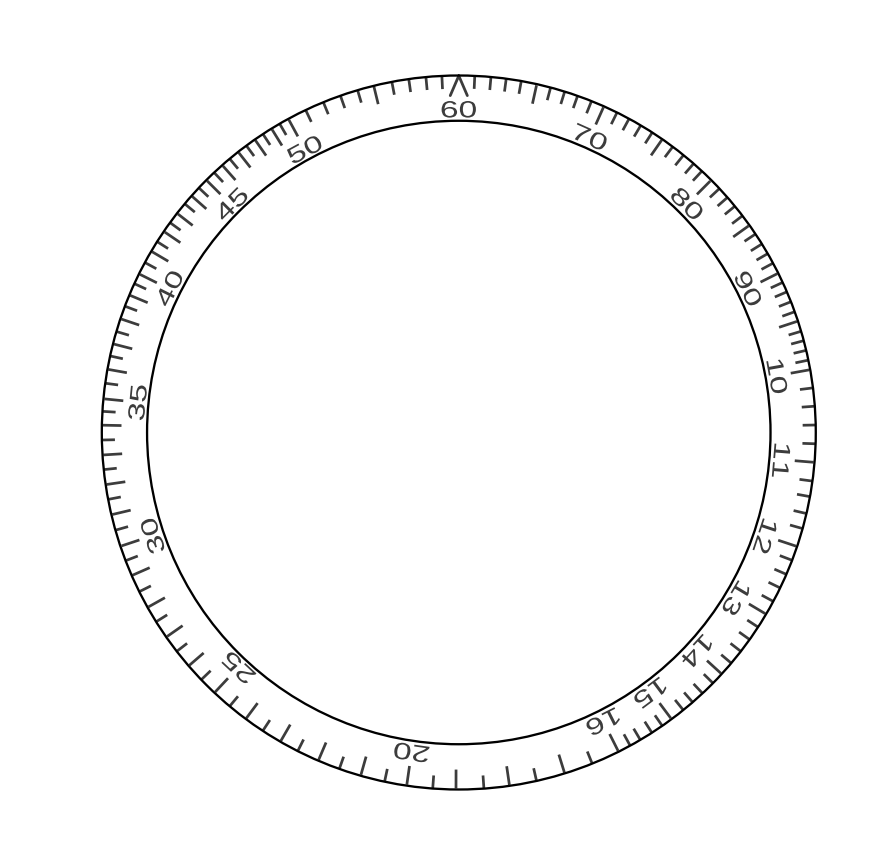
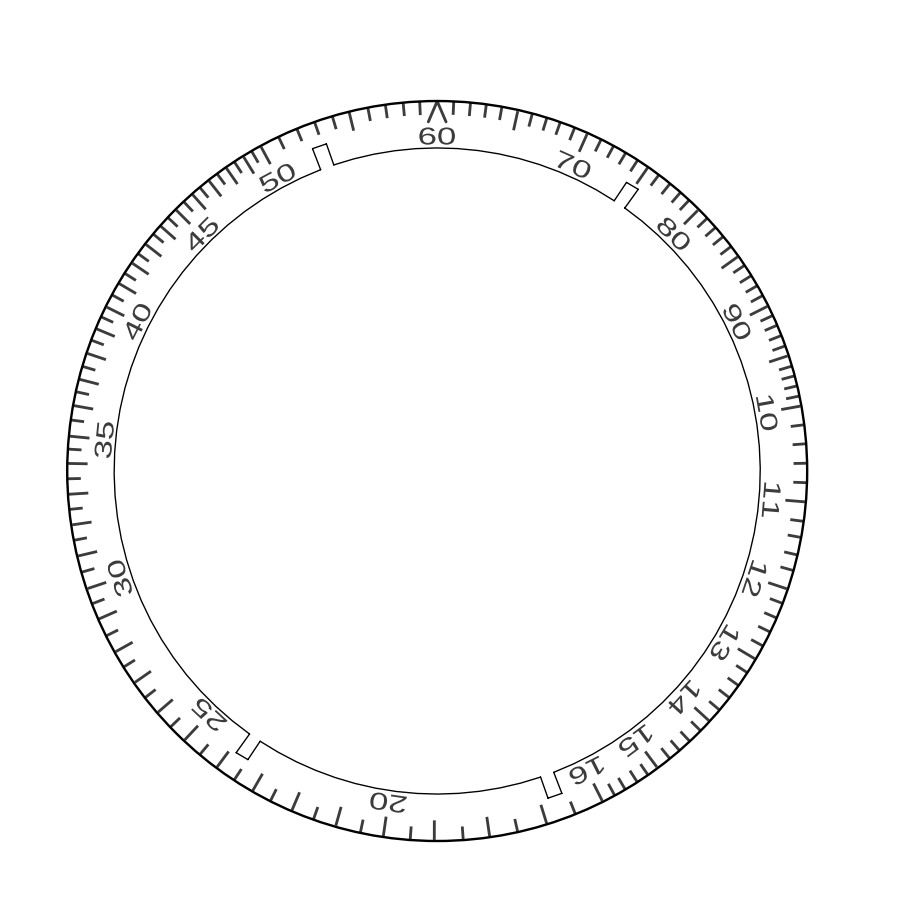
board edge: none -> (326, 143) (333, 164) (394, 150) (457, 148) (498, 153) (539, 164) (577, 180) (614, 200) (626, 182) (638, 189) (624, 208) (673, 250) (701, 284) (723, 321) (741, 361) (756, 424) (759, 489) (754, 532) (735, 595) (704, 652) (662, 702) (611, 742) (553, 772) (561, 793) (547, 798) (540, 777) (500, 787) (458, 793) (417, 793) (375, 788) (315, 770) (260, 741) (247, 759) (236, 752) (249, 734) (200, 691) (173, 657) (150, 620) (133, 580) (121, 538) (114, 474) (120, 409) (138, 346) (169, 289) (196, 255) (244, 211) (281, 188) (320, 169) (312, 148) (326, 143)
round board edge: [145, 119, 772, 746] -> none

